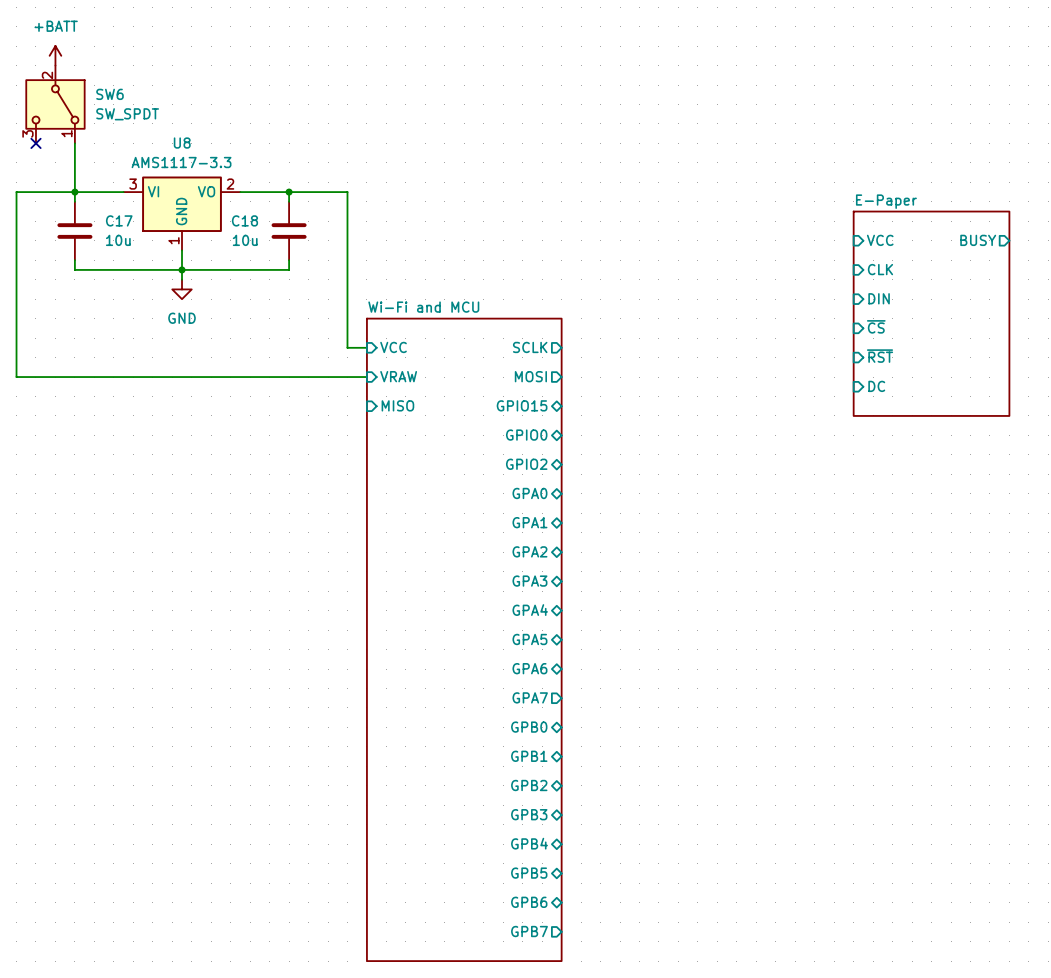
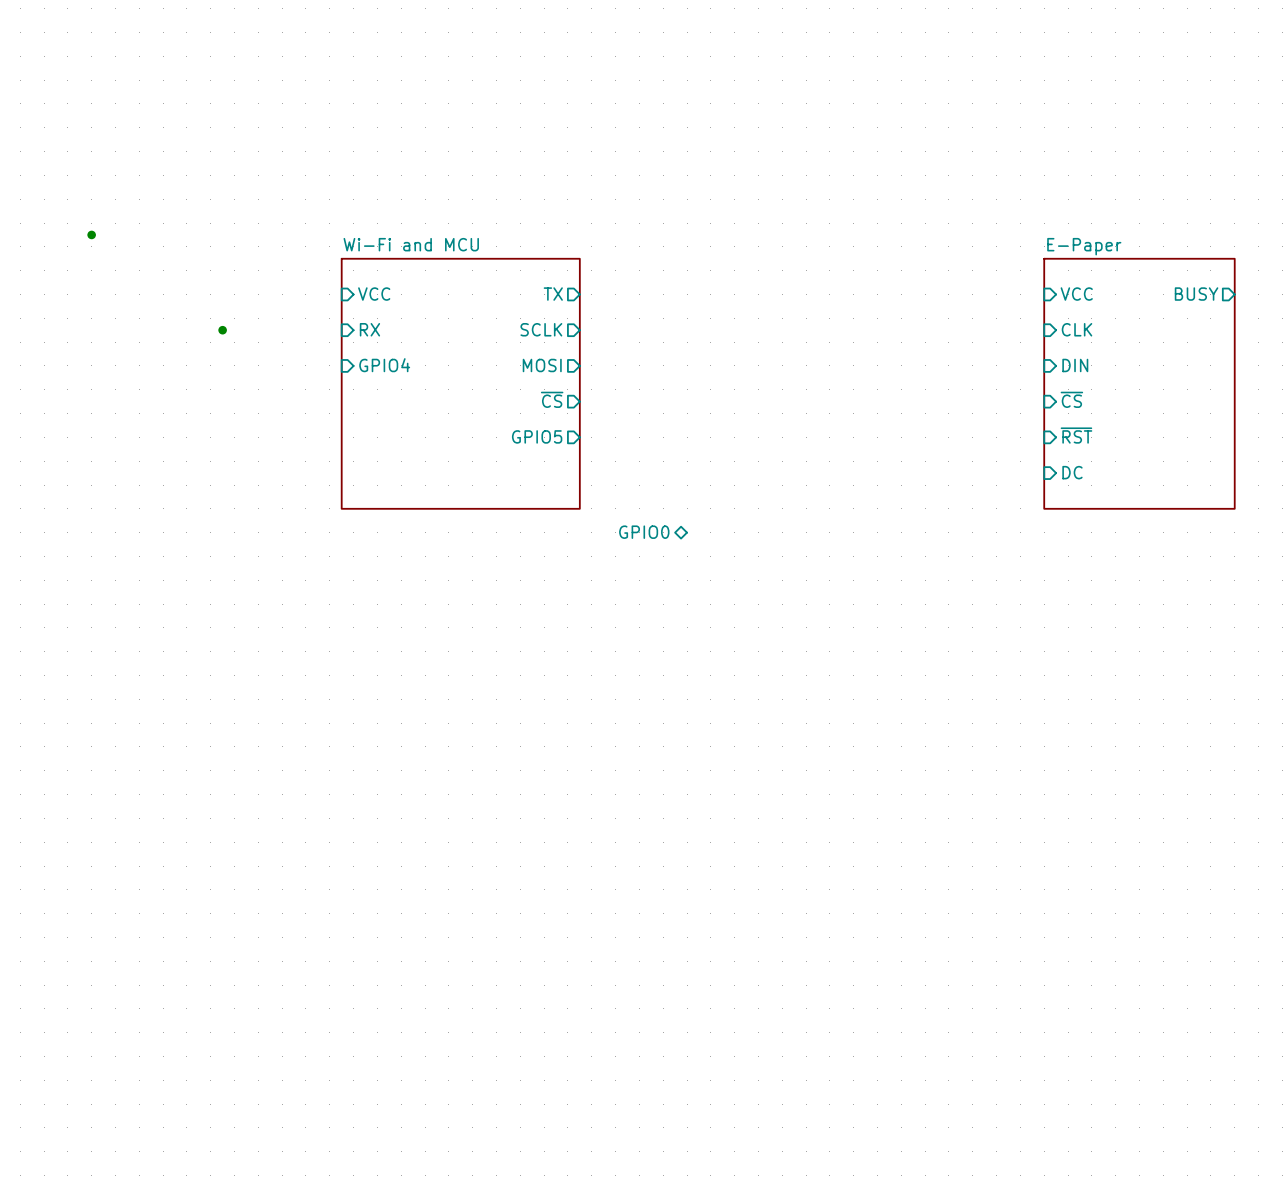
power symbol: +BATT (55, 55) -> none
SW6: SW_SPDT (55, 104) -> none
no-connect mark: (35, 143) -> none
wire: (74, 143) (74, 201) -> none
wire: (123, 192) (16, 192) (16, 377) (366, 377) -> none
wire: (240, 192) (347, 192) (347, 347) (366, 347) -> none
junction: (289, 192) -> none
U8: AMS1117-3.3 (182, 213) -> none
C17: 10u (74, 231) -> none
C18: 10u (289, 231) -> none
sheet pin: none -> TX (553, 294)
wire: (182, 250) (182, 279) -> none
wire: (74, 260) (74, 269) (289, 269) (289, 260) -> none
sheet pin: none -> RX (369, 329)
power symbol: GND (182, 289) -> none
sheet pin: none -> GPIO4 (384, 365)
sheet Wi-Fi and MCU: none -> (460, 383)
sheet pin: none -> ~{CS} (552, 399)
sheet pin position: VCC (393, 347) -> VCC (374, 294)
sheet pin position: SCLK (530, 347) -> SCLK (541, 329)
sheet pin: none -> GPIO5 (537, 436)
sheet pin: VRAW (398, 376) -> none
sheet pin position: MOSI (530, 376) -> MOSI (542, 365)
sheet pin: MISO (397, 405) -> none
sheet pin: GPIO15 (522, 405) -> none
sheet pin: GPIO2 (526, 464) -> none
sheet pin: GPA0 (529, 493) -> none
sheet pin: GPA1 (529, 522) -> none
sheet pin: GPA2 (529, 551) -> none
sheet pin: GPA3 (529, 581) -> none
sheet pin: GPA4 (530, 610) -> none
sheet Wi-Fi and MCU: (464, 639) -> none
sheet pin: GPA5 (529, 639) -> none
sheet pin: GPA6 (529, 668) -> none
sheet pin: GPA7 (530, 697) -> none
sheet pin: GPB0 (529, 727) -> none
sheet pin: GPB1 (529, 756) -> none
sheet pin: GPB2 (529, 785) -> none
sheet pin: GPB3 (529, 814) -> none
sheet pin: GPB4 (529, 843) -> none
sheet pin: GPB5 (529, 873) -> none
sheet pin: GPB6 (529, 902) -> none
sheet pin: GPB7 (529, 931) -> none

